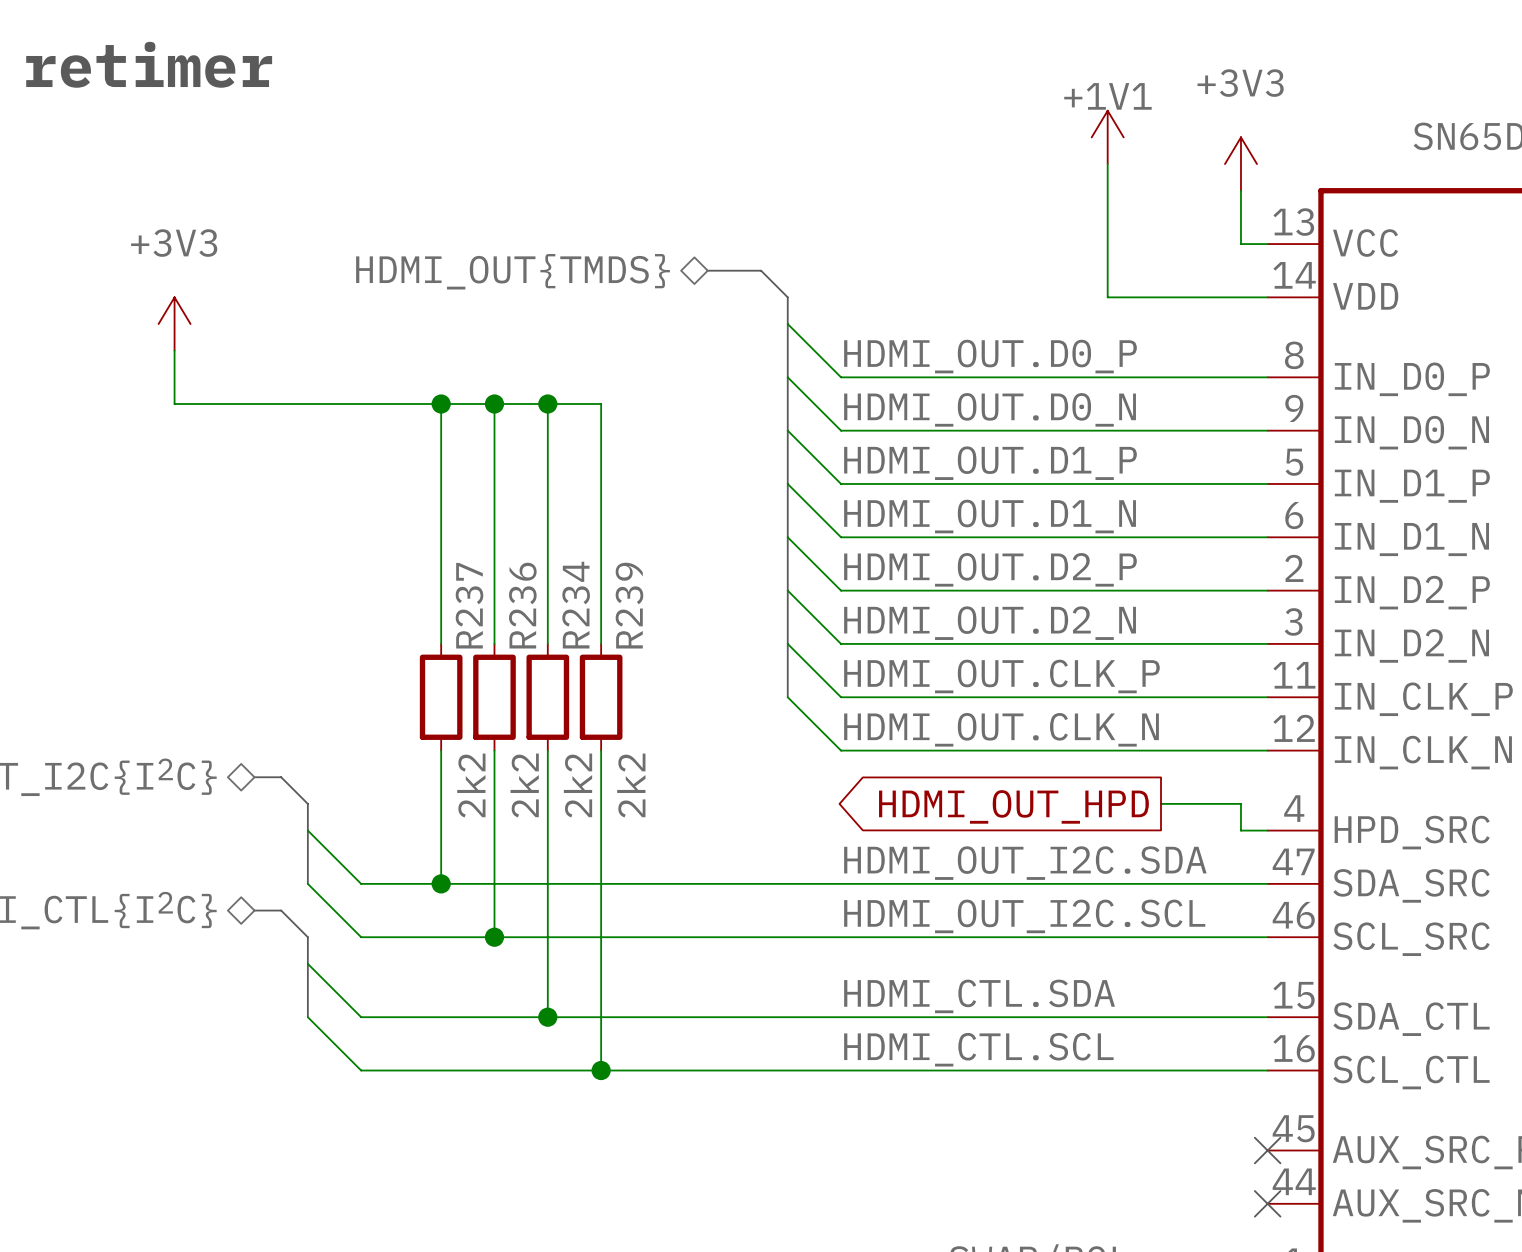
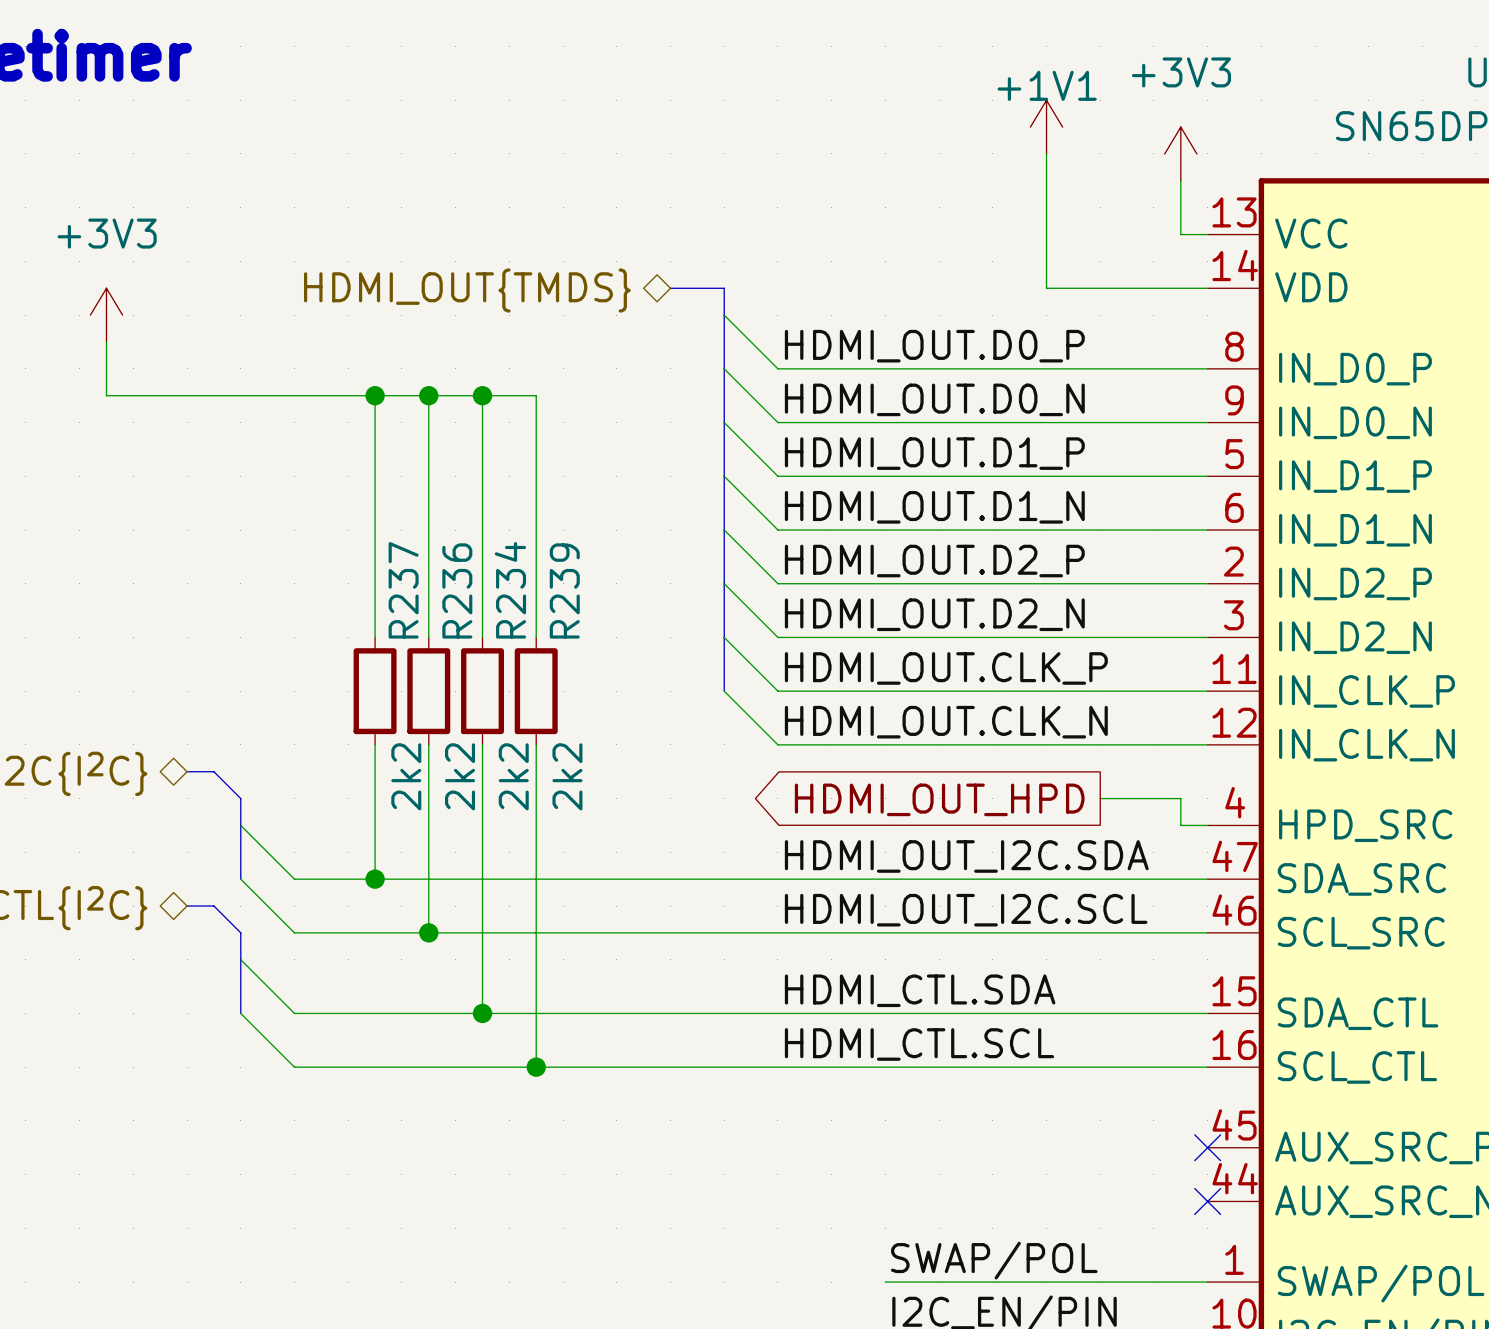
bus: (707, 270) (761, 270) (787, 297) -> (670, 288) (724, 288)
hierarchical label position: HDMI_OUT{TMDS} (513, 271) -> HDMI_OUT{TMDS} (467, 290)

